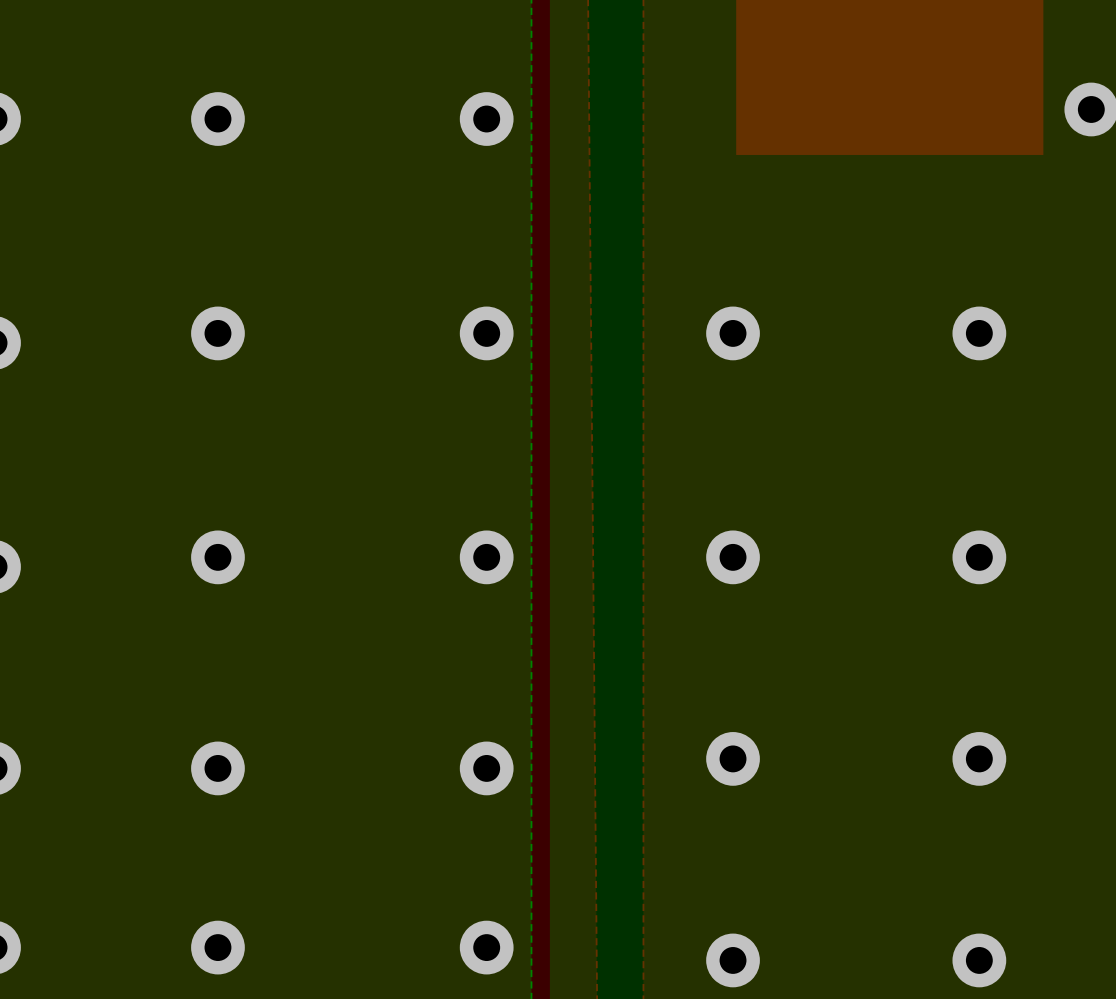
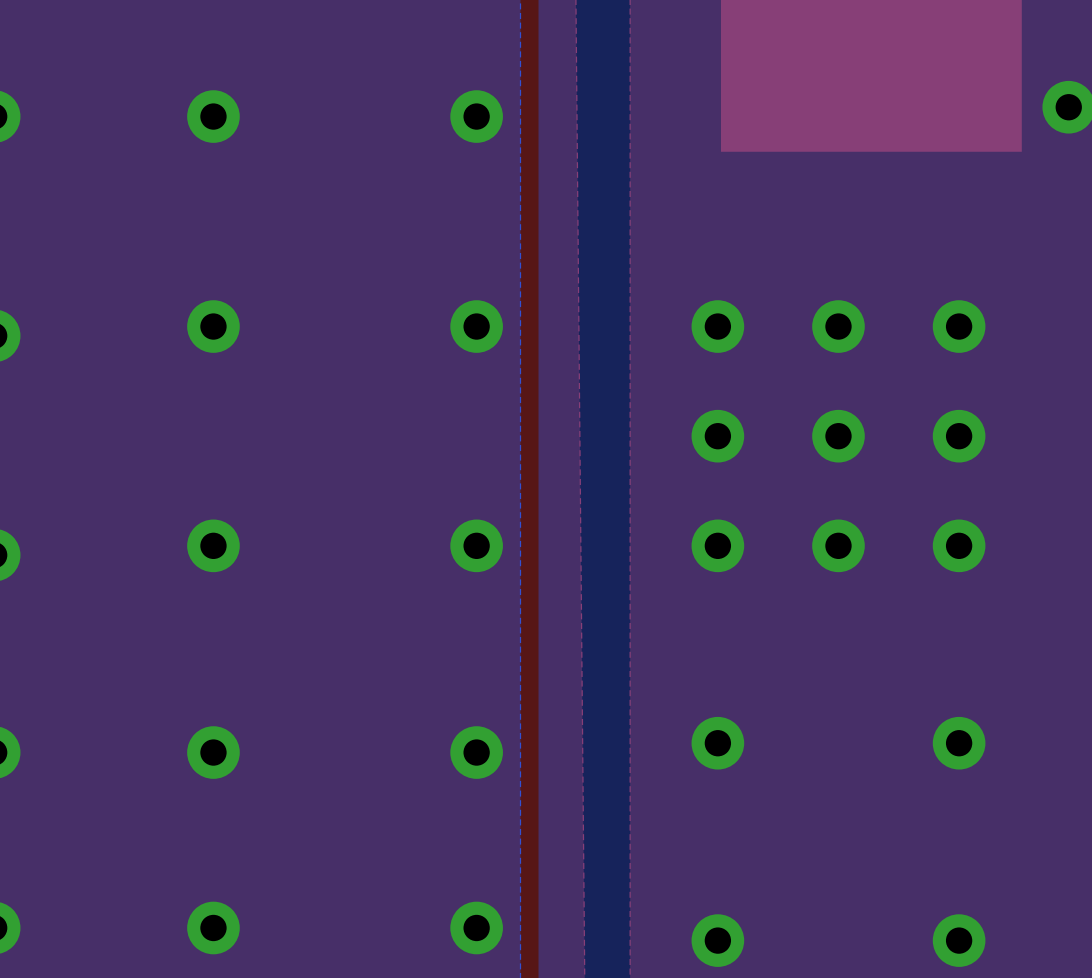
via: none -> (838, 326)
via: none -> (717, 436)
via: none -> (838, 436)
via: none -> (959, 436)
via: none -> (838, 545)

